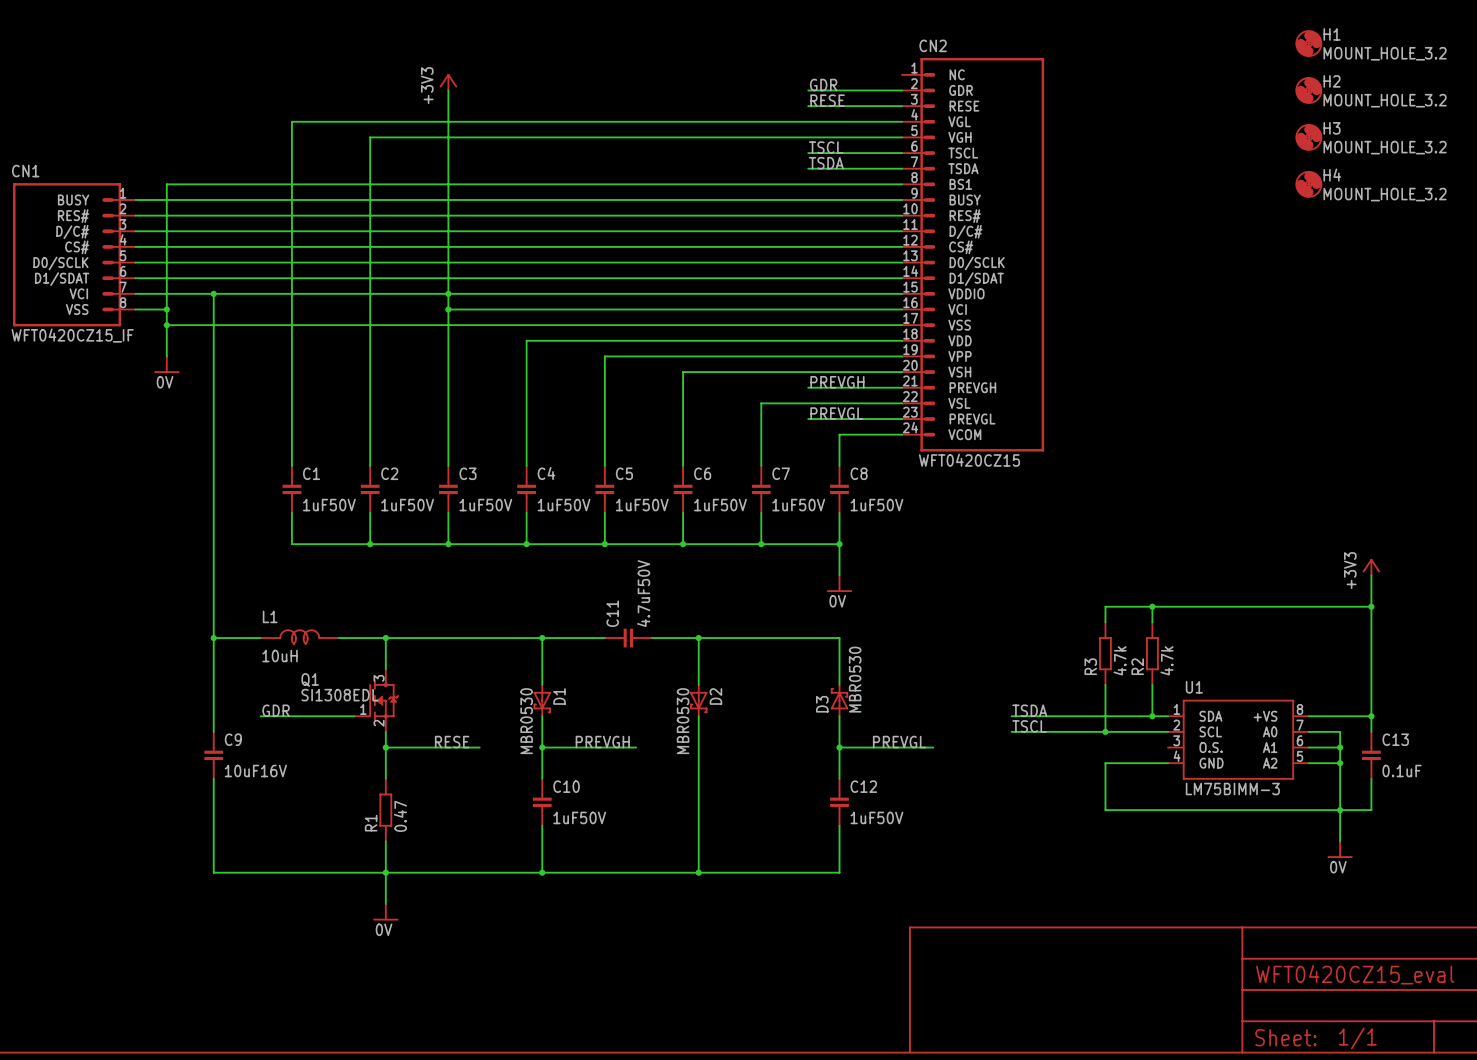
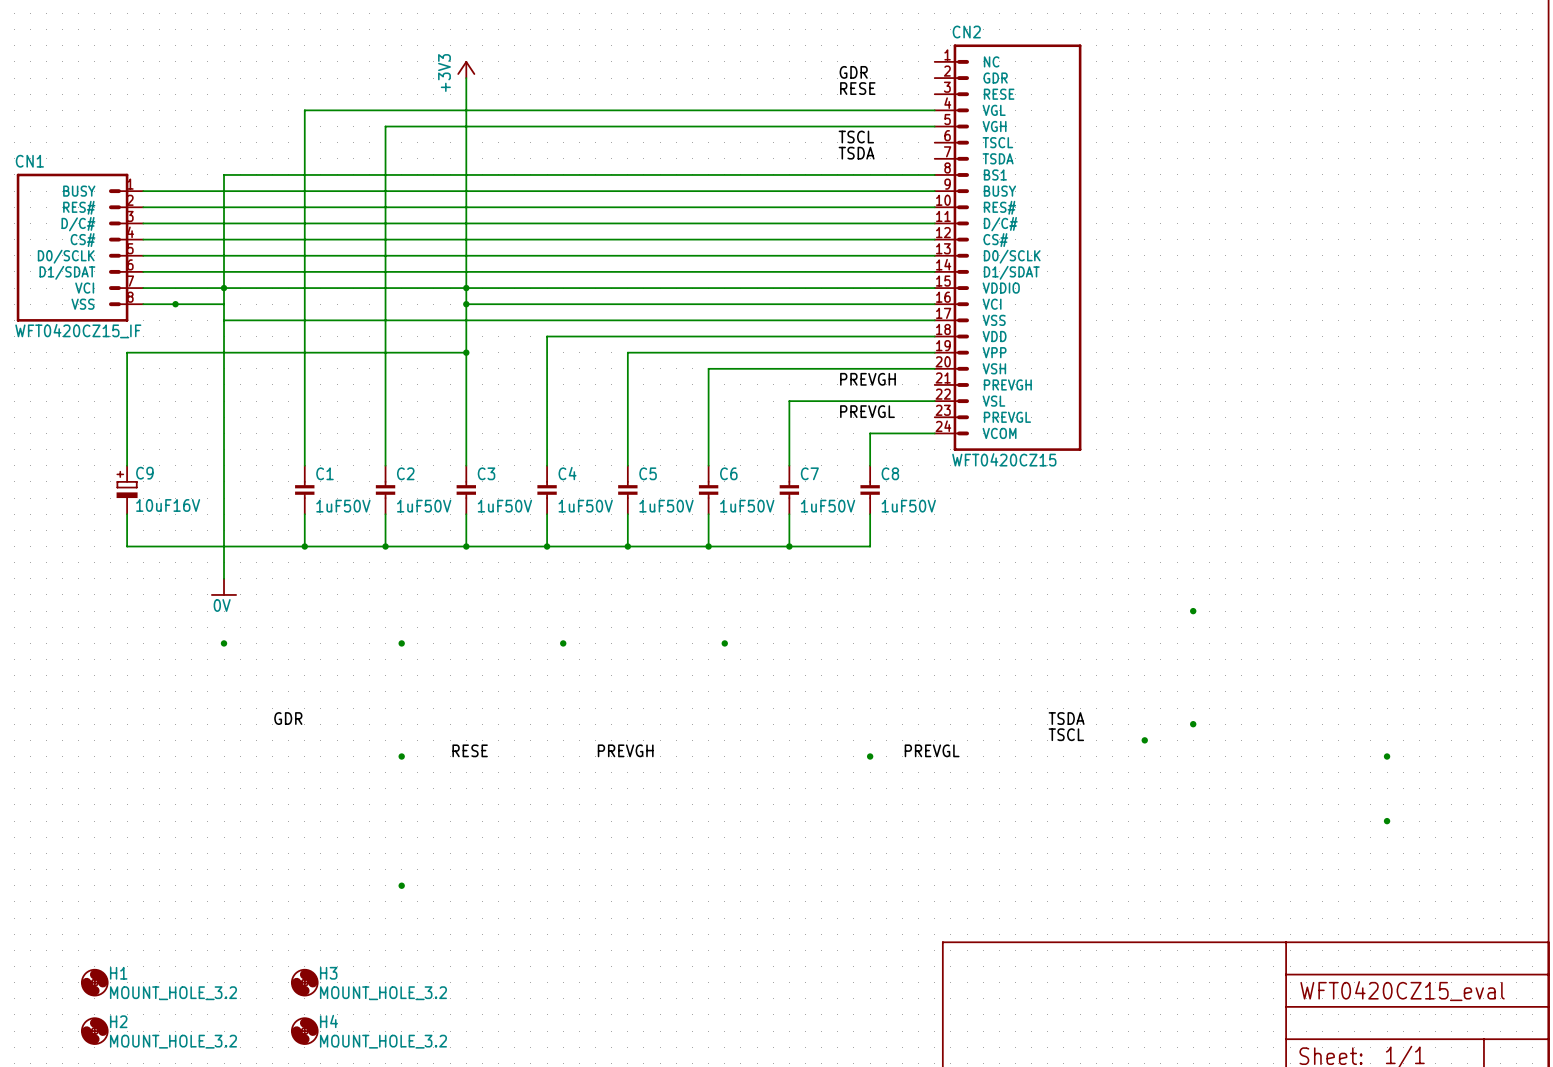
H1 position: (1308, 43) -> (94, 982)
wire: (808, 90) (902, 90) -> none
H2 position: (1308, 90) -> (94, 1031)
wire: (808, 106) (902, 106) -> none
H3 position: (1308, 137) -> (304, 982)
wire: (808, 153) (902, 153) -> none
wire: (808, 168) (902, 168) -> none
wire: (213, 184) (166, 184) (166, 356) -> (224, 174) (224, 288)
H4 position: (1308, 184) -> (304, 1031)
wire: (166, 325) (213, 325) -> (175, 304) (224, 304)
junction: (166, 325) -> none
wire: none -> (466, 352) (127, 352) (127, 465)
junction: none -> (466, 352)
power symbol: 0V (166, 364) -> none
wire: (808, 387) (902, 387) -> none
wire: (808, 419) (902, 419) -> none
wire: none -> (127, 514) (127, 546) (304, 546)
junction: none -> (304, 546)
wire: (839, 544) (839, 575) -> none
junction: (839, 544) -> none
power symbol: +3V3 (1371, 567) -> none
wire: (213, 575) (213, 731) -> none
wire: (1371, 575) (1371, 731) -> none
power symbol: none -> 0V (224, 587)
power symbol: 0V (839, 583) -> none
wire: (1152, 606) (1152, 622) -> none
wire: (1371, 606) (1105, 606) (1105, 622) -> none
junction: (1371, 606) -> none
L1: 10uH (299, 637) -> none
wire: (213, 638) (260, 638) -> none
wire: (338, 638) (604, 638) -> none
wire: (385, 638) (385, 669) -> none
wire: (542, 638) (542, 684) -> none
C11: 4.7uF50V (628, 638) -> none
wire: (651, 638) (839, 638) (839, 684) -> none
wire: (698, 638) (698, 684) -> none
R3: 4.7k (1105, 653) -> none
R2: 4.7k (1152, 653) -> none
wire: (1105, 684) (1105, 731) -> none
wire: (1152, 684) (1152, 716) -> none
Q1: SI1308EDL (376, 700) -> none
D1: MBR0530 (542, 700) -> none
D2: MBR0530 (698, 700) -> none
D3: MBR0530 (839, 700) -> none
wire: (260, 716) (354, 716) -> none
wire: (542, 716) (542, 778) -> none
wire: (698, 716) (698, 872) -> none
wire: (839, 716) (839, 778) -> none
wire: (1011, 716) (1168, 716) -> none
wire: (1308, 716) (1371, 716) -> none
junction: (1371, 716) -> none
C9 symbol: [204, 731, 224, 779] -> [116, 465, 138, 515]
wire: (385, 731) (385, 778) -> none
wire: (1011, 731) (1168, 731) -> none
wire: (1308, 731) (1340, 731) (1340, 841) -> none
U1: LM75BIMM-3 (1238, 739) -> none
wire: (385, 747) (479, 747) -> none
wire: (542, 747) (636, 747) -> none
junction: (542, 747) -> none
wire: (839, 747) (933, 747) -> none
wire: (1308, 747) (1340, 747) -> none
C13: 0.1uF (1371, 755) -> none
wire: (1168, 763) (1105, 763) (1105, 810) (1371, 810) (1371, 778) -> none
wire: (1308, 763) (1340, 763) -> none
junction: (1340, 763) -> none
wire: (213, 778) (213, 872) (839, 872) (839, 825) -> none
C10: 1uF50V (542, 802) -> none
C12: 1uF50V (839, 802) -> none
R1: 0.47 (385, 810) -> none
wire: (542, 825) (542, 872) -> none
wire: (385, 841) (385, 903) -> none
power symbol: 0V (1340, 849) -> none
junction: (542, 872) -> none
junction: (698, 872) -> none
power symbol: 0V (385, 912) -> none

